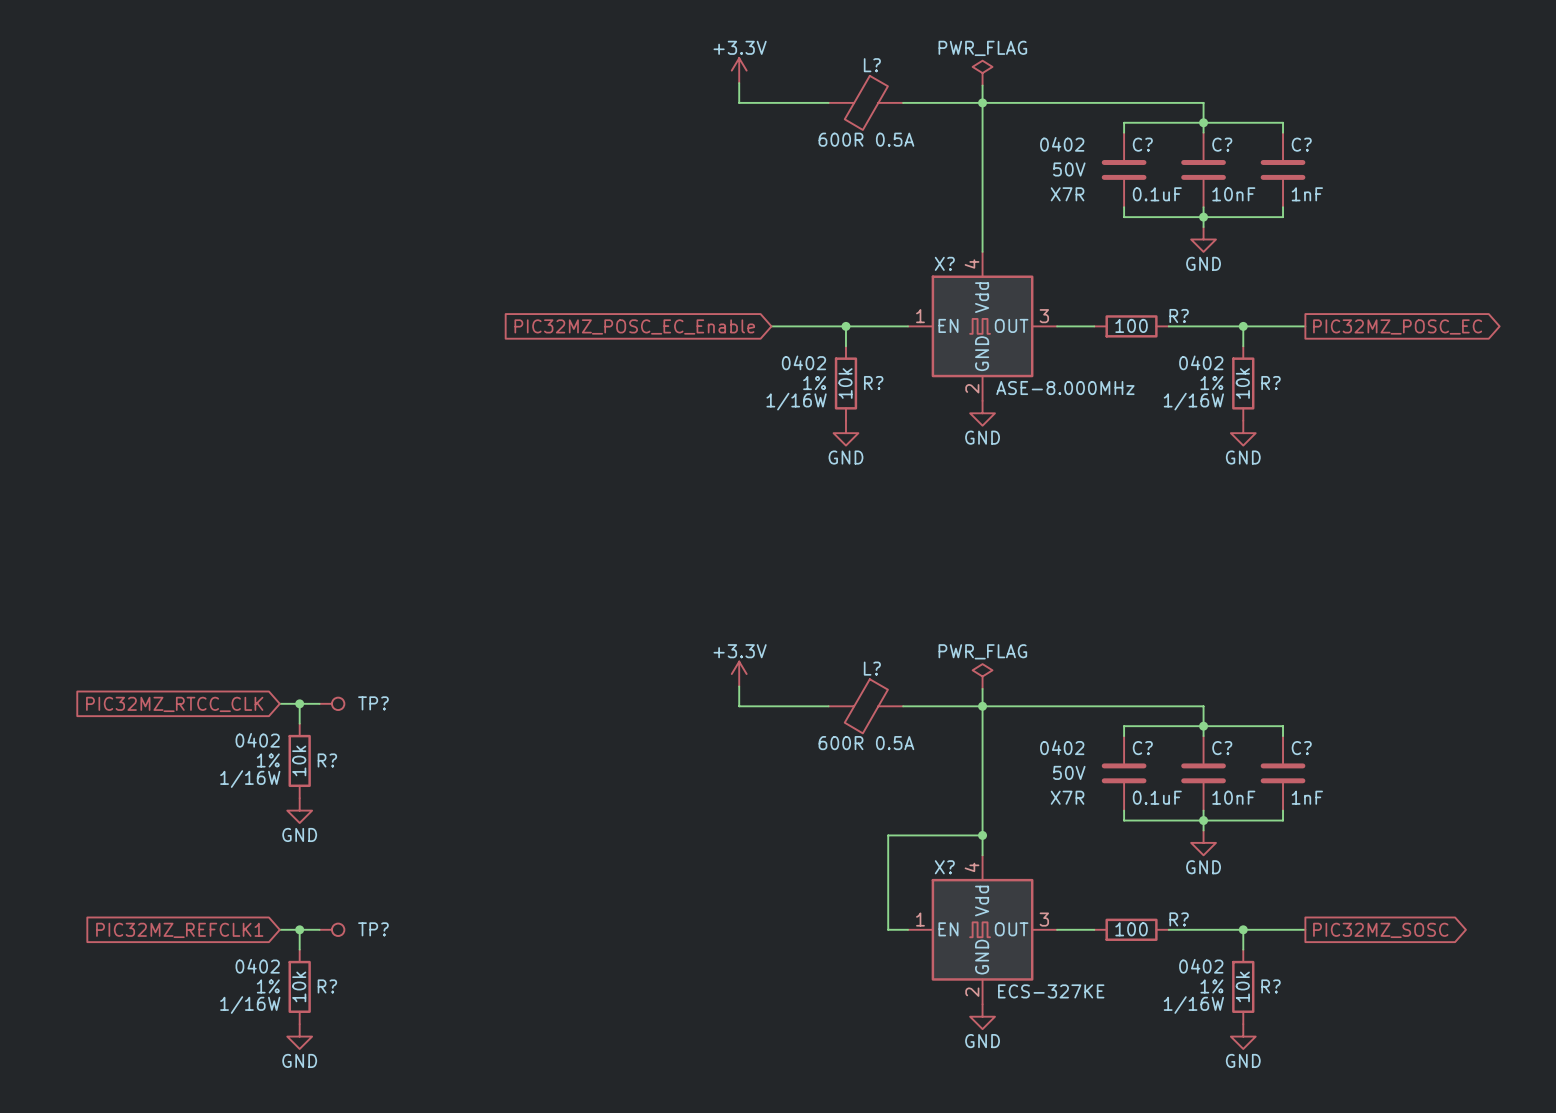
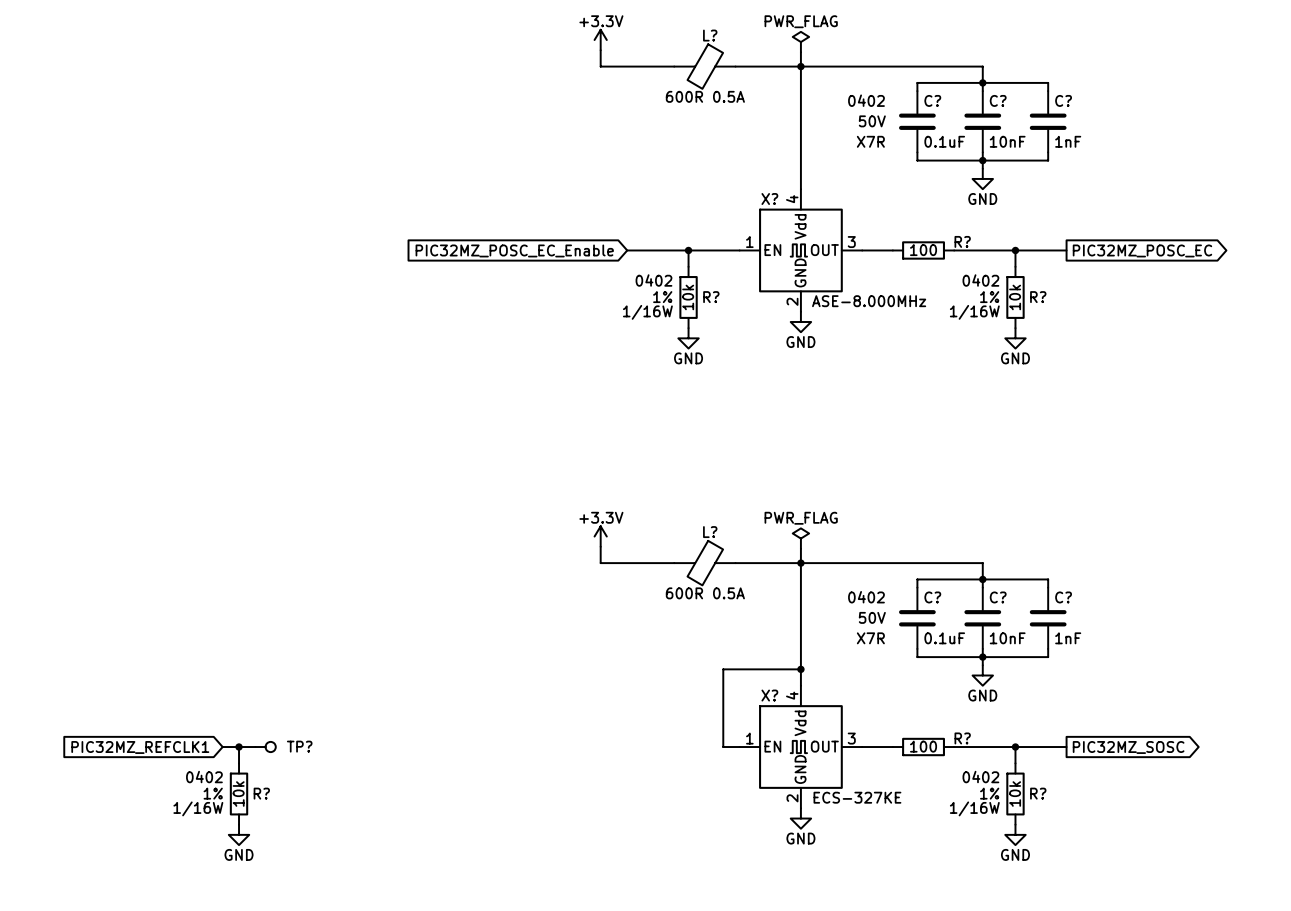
wire: (279, 703) (319, 703) -> none
wire: (299, 703) (299, 723) -> none
junction: (299, 703) -> none
TP?: (331, 703) -> none
global label: PIC32MZ_RTCC_CLK (174, 704) -> none
R?: 10k (299, 760) -> none
power symbol: GND (299, 810) -> none

